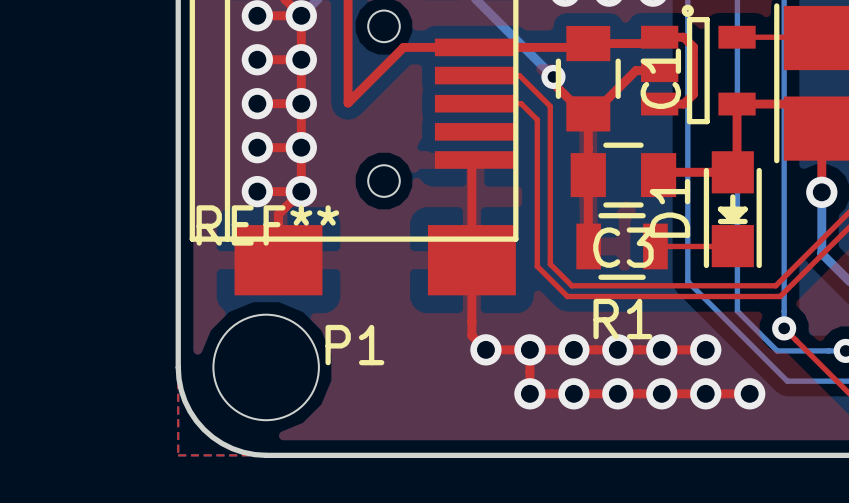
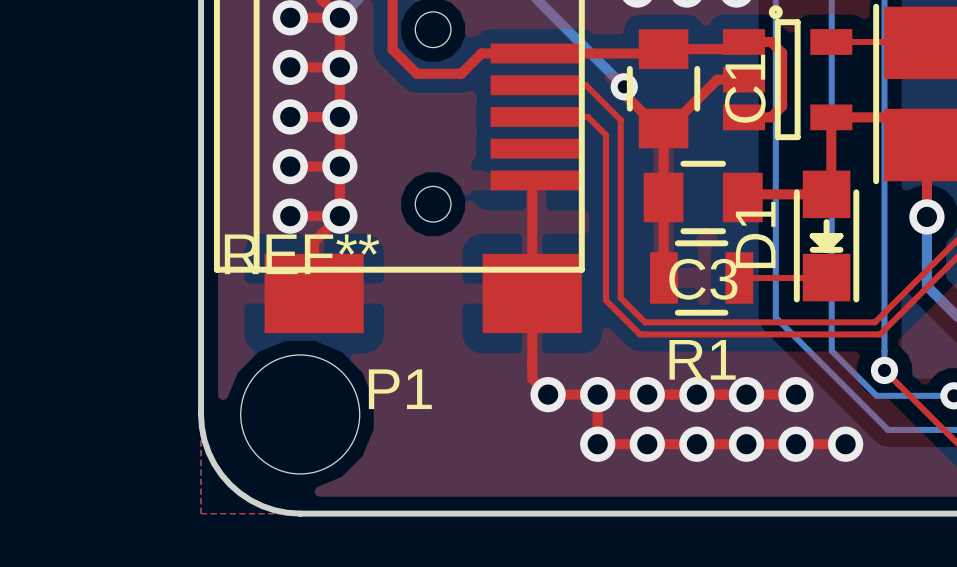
top track: (348, 43) (348, 102) (403, 47) (426, 47) -> (392, 49) (416, 73) (461, 73) (481, 53)

